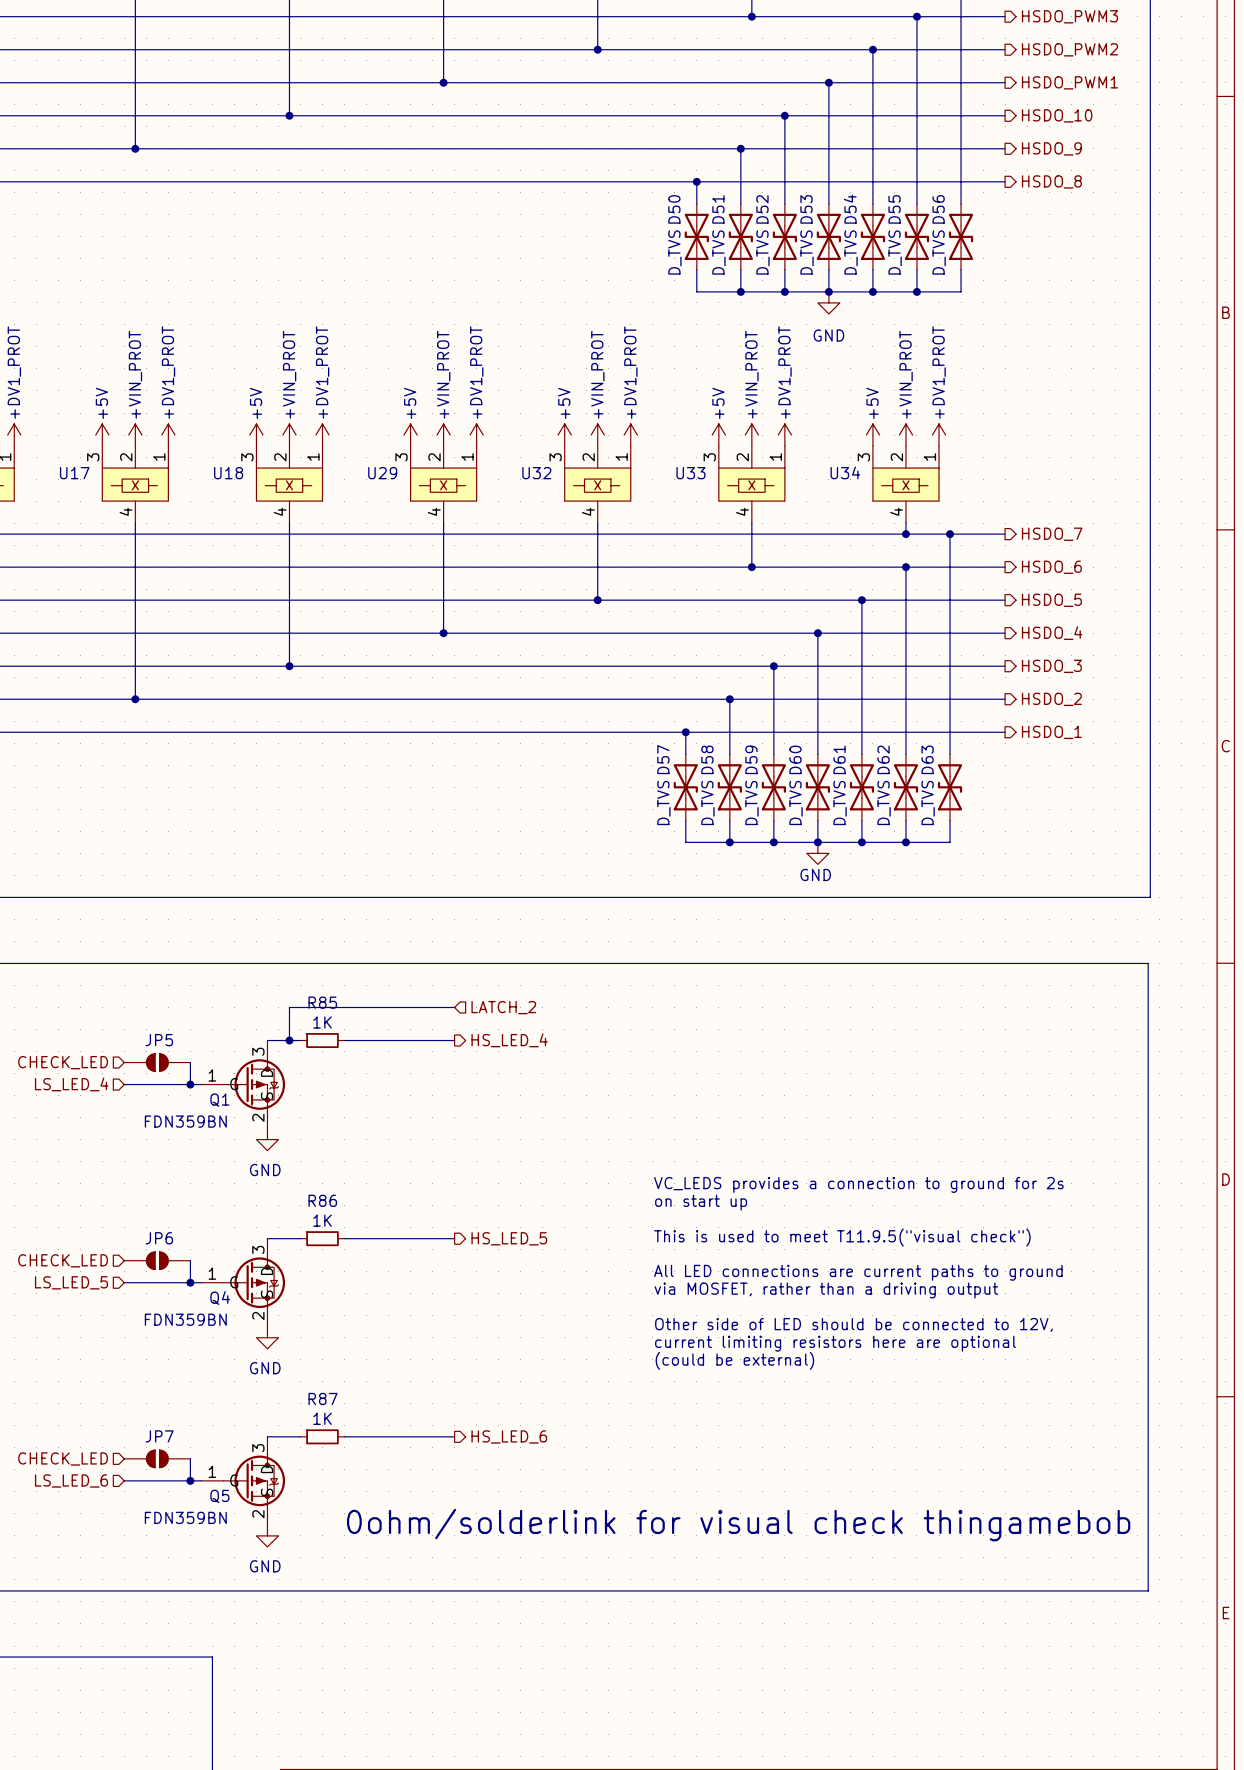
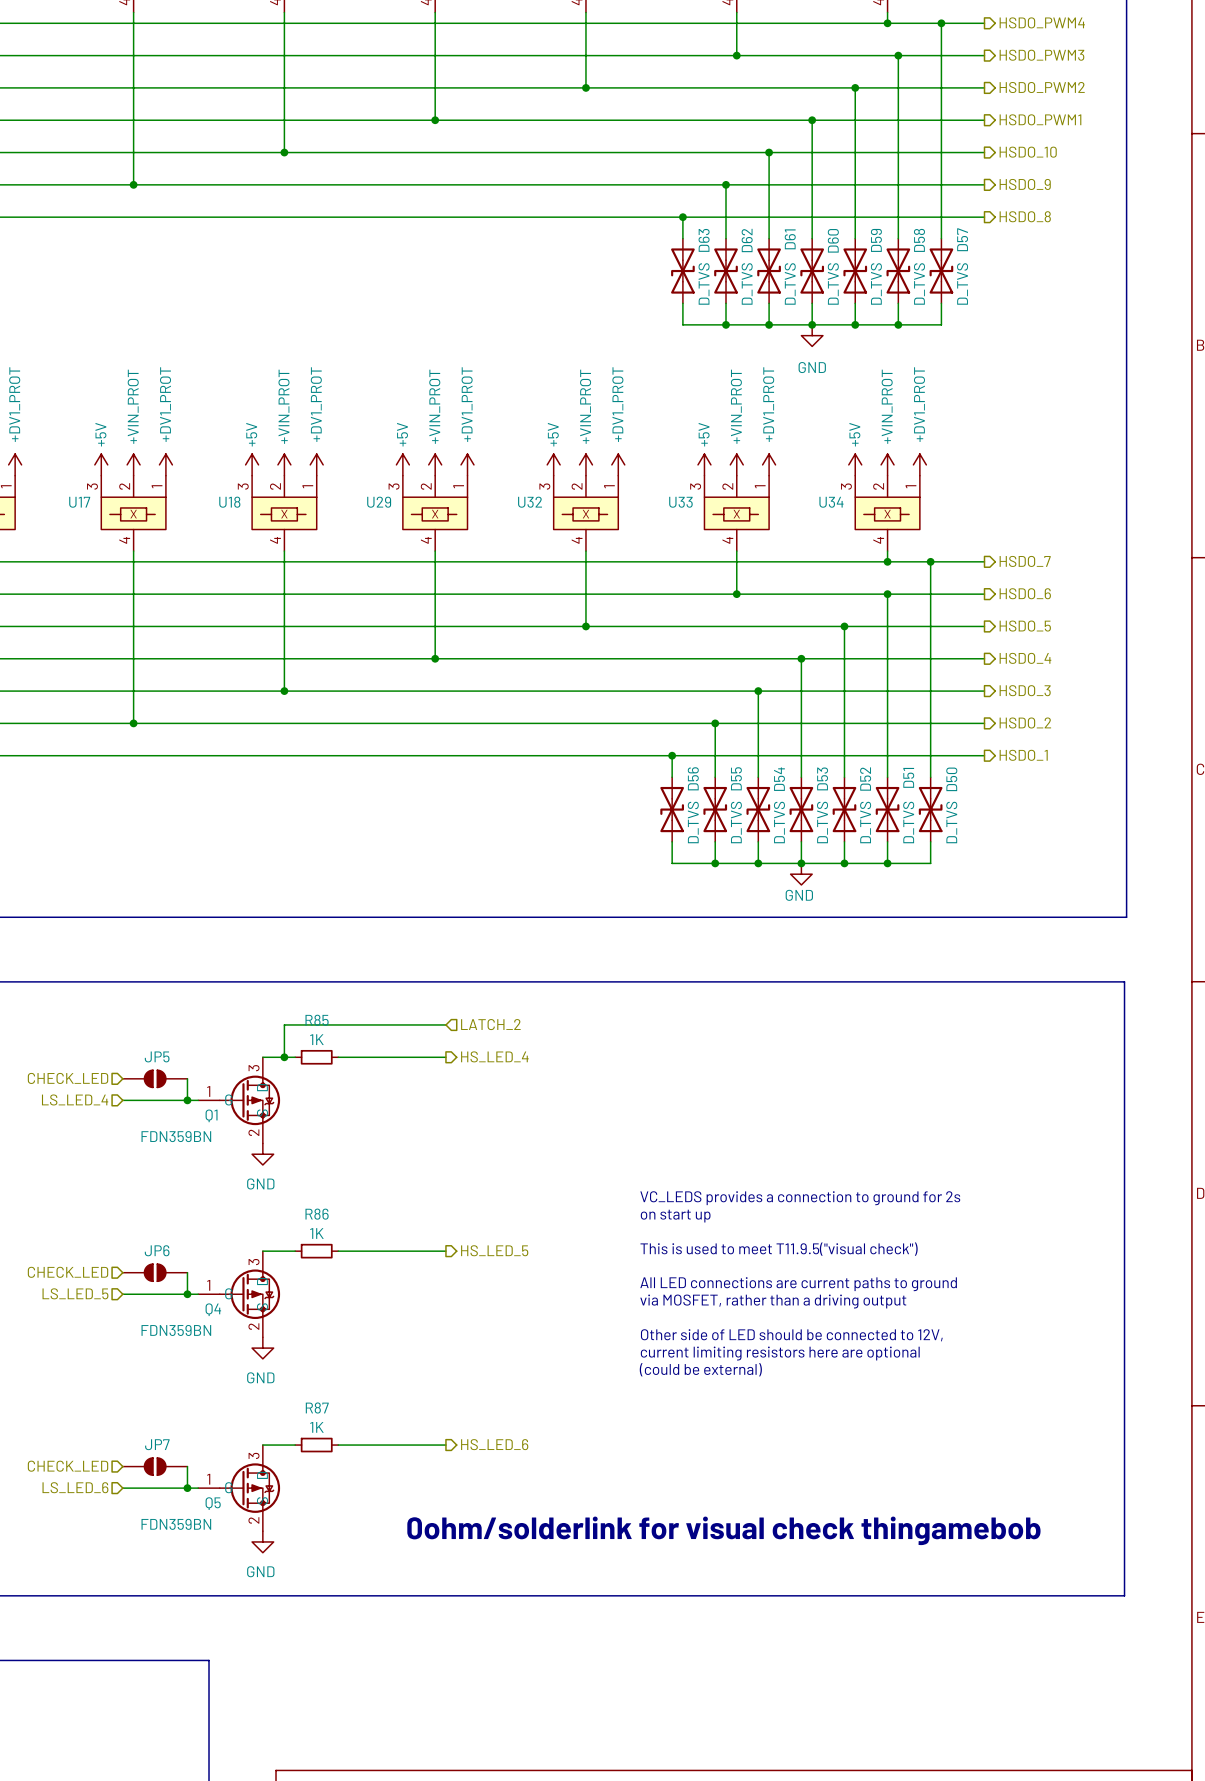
D50 flip: as is (696, 236) -> left-right (930, 809)
D50 position: (696, 236) -> (930, 809)
D51 flip: as is (740, 236) -> left-right (887, 809)
D51 position: (740, 236) -> (887, 809)
D52 flip: as is (784, 236) -> left-right (844, 809)
D52 position: (784, 236) -> (844, 809)
D53 flip: as is (828, 236) -> left-right (801, 809)
D53 position: (828, 236) -> (801, 809)
D54 flip: as is (872, 236) -> left-right (758, 809)
D54 position: (872, 236) -> (758, 809)
D55 flip: as is (916, 236) -> left-right (715, 809)
D55 position: (916, 236) -> (715, 809)
D56 flip: as is (961, 236) -> left-right (672, 809)
D56 position: (961, 236) -> (672, 809)
D57 flip: as is (685, 787) -> left-right (941, 271)
D57 position: (685, 787) -> (941, 271)
D58 flip: as is (729, 787) -> left-right (898, 271)
D58 position: (729, 787) -> (898, 271)
D59 flip: as is (773, 787) -> left-right (855, 271)
D59 position: (773, 787) -> (855, 271)
D60 flip: as is (817, 787) -> left-right (812, 271)
D60 position: (817, 787) -> (812, 271)
D61 flip: as is (861, 787) -> left-right (769, 271)
D61 position: (861, 787) -> (769, 271)
D62 flip: as is (905, 787) -> left-right (726, 271)
D62 position: (905, 787) -> (726, 271)
D63 flip: as is (950, 787) -> left-right (682, 271)
D63 position: (950, 787) -> (682, 271)

